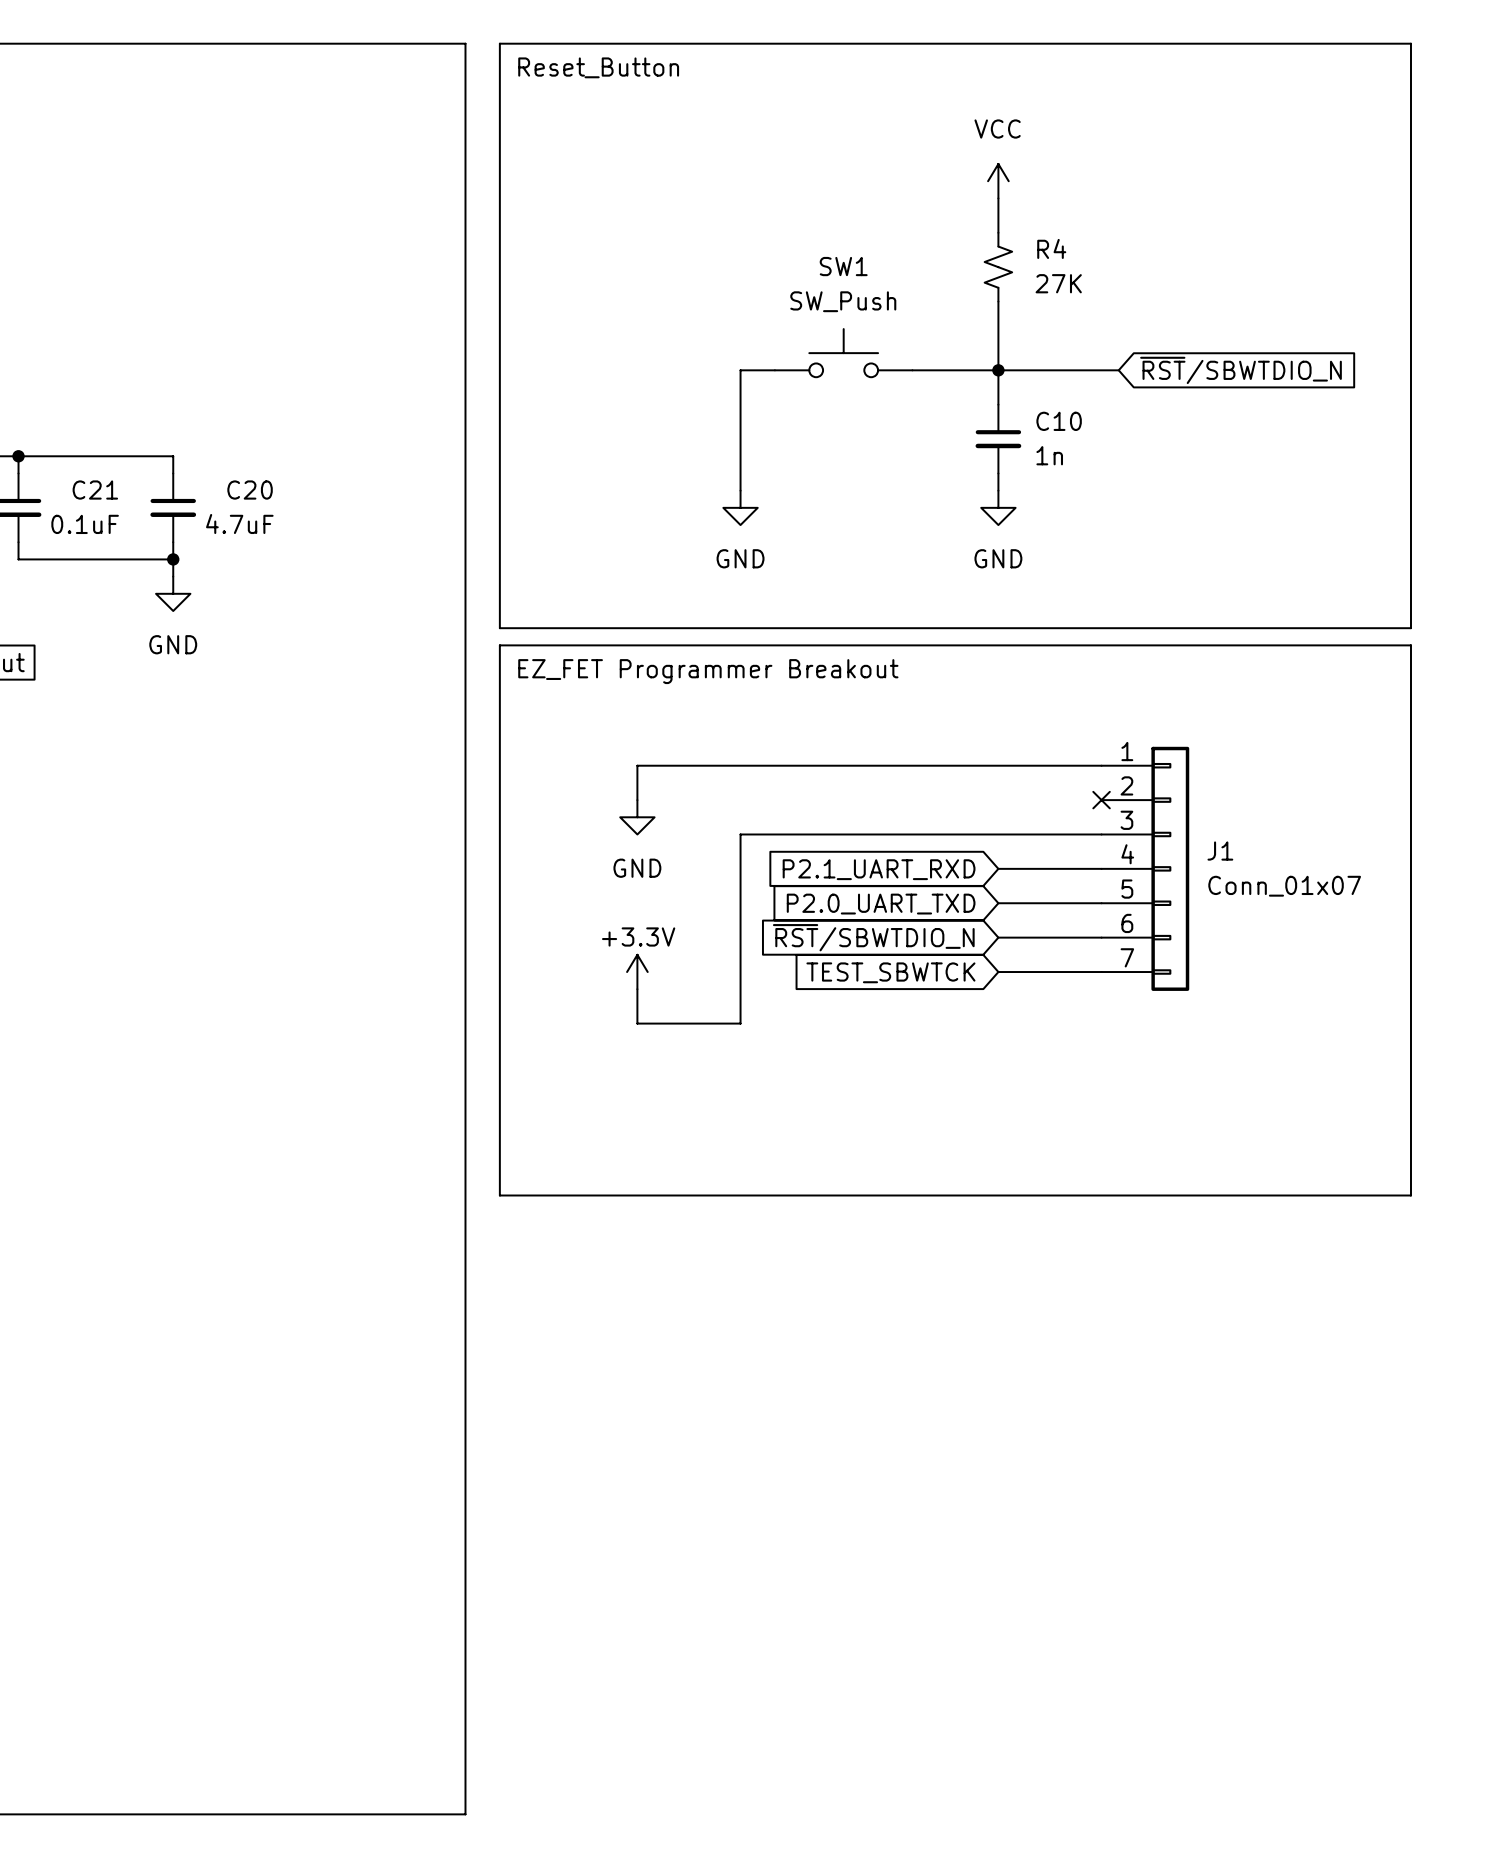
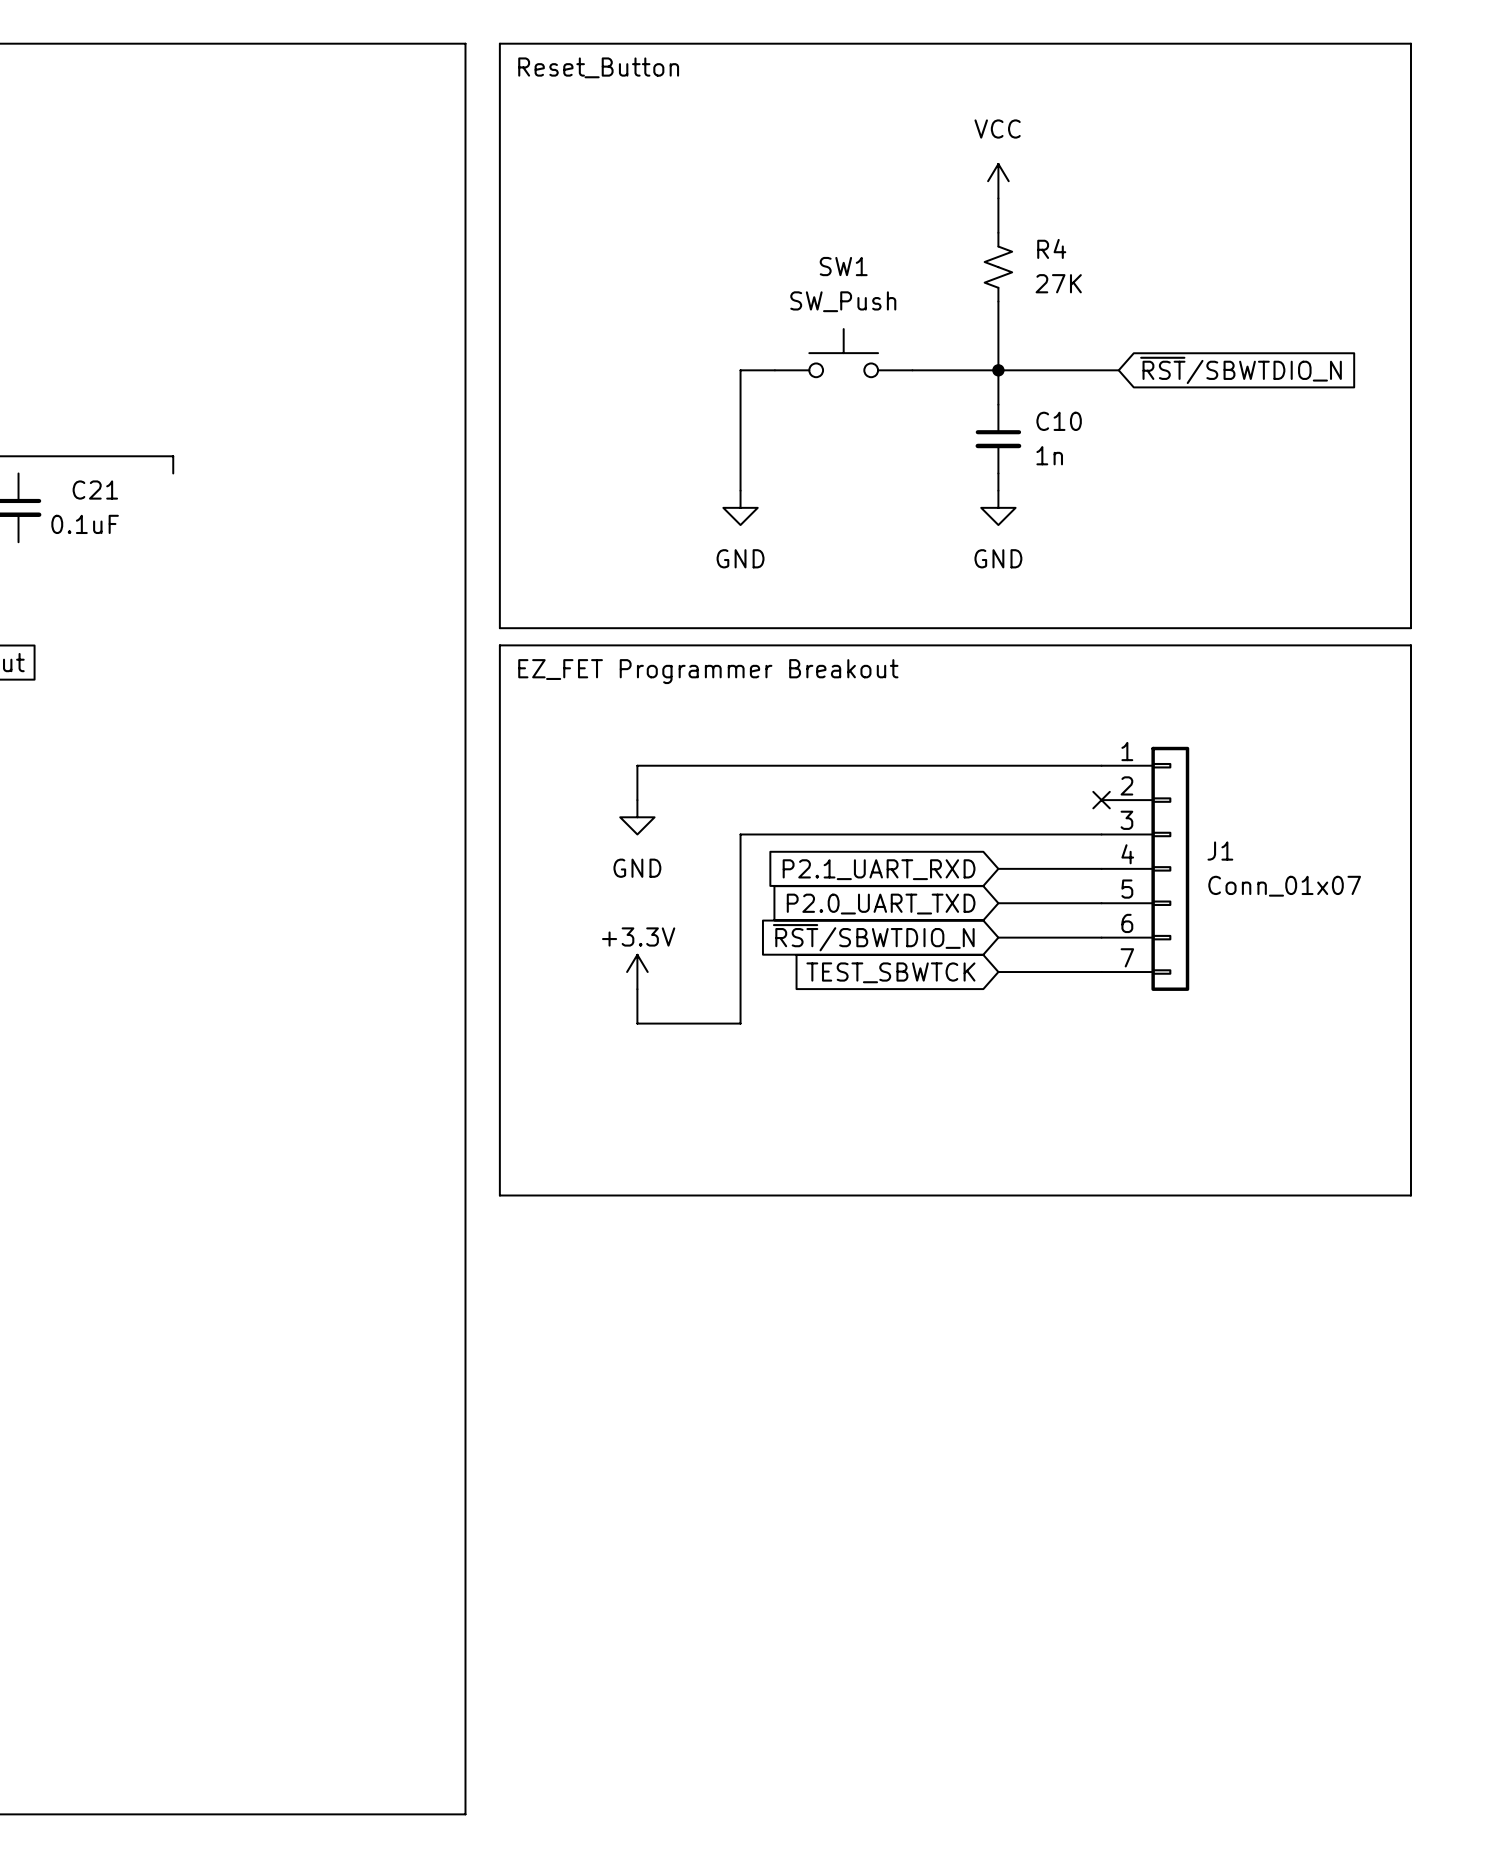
wire: (18, 456) (18, 473) -> none
junction: (18, 456) -> none
C20: 4.7uF (173, 507) -> none
wire: (18, 542) (18, 559) (173, 559) -> none
wire: (173, 542) (173, 576) -> none
junction: (173, 559) -> none
power symbol: GND (173, 593) -> none

